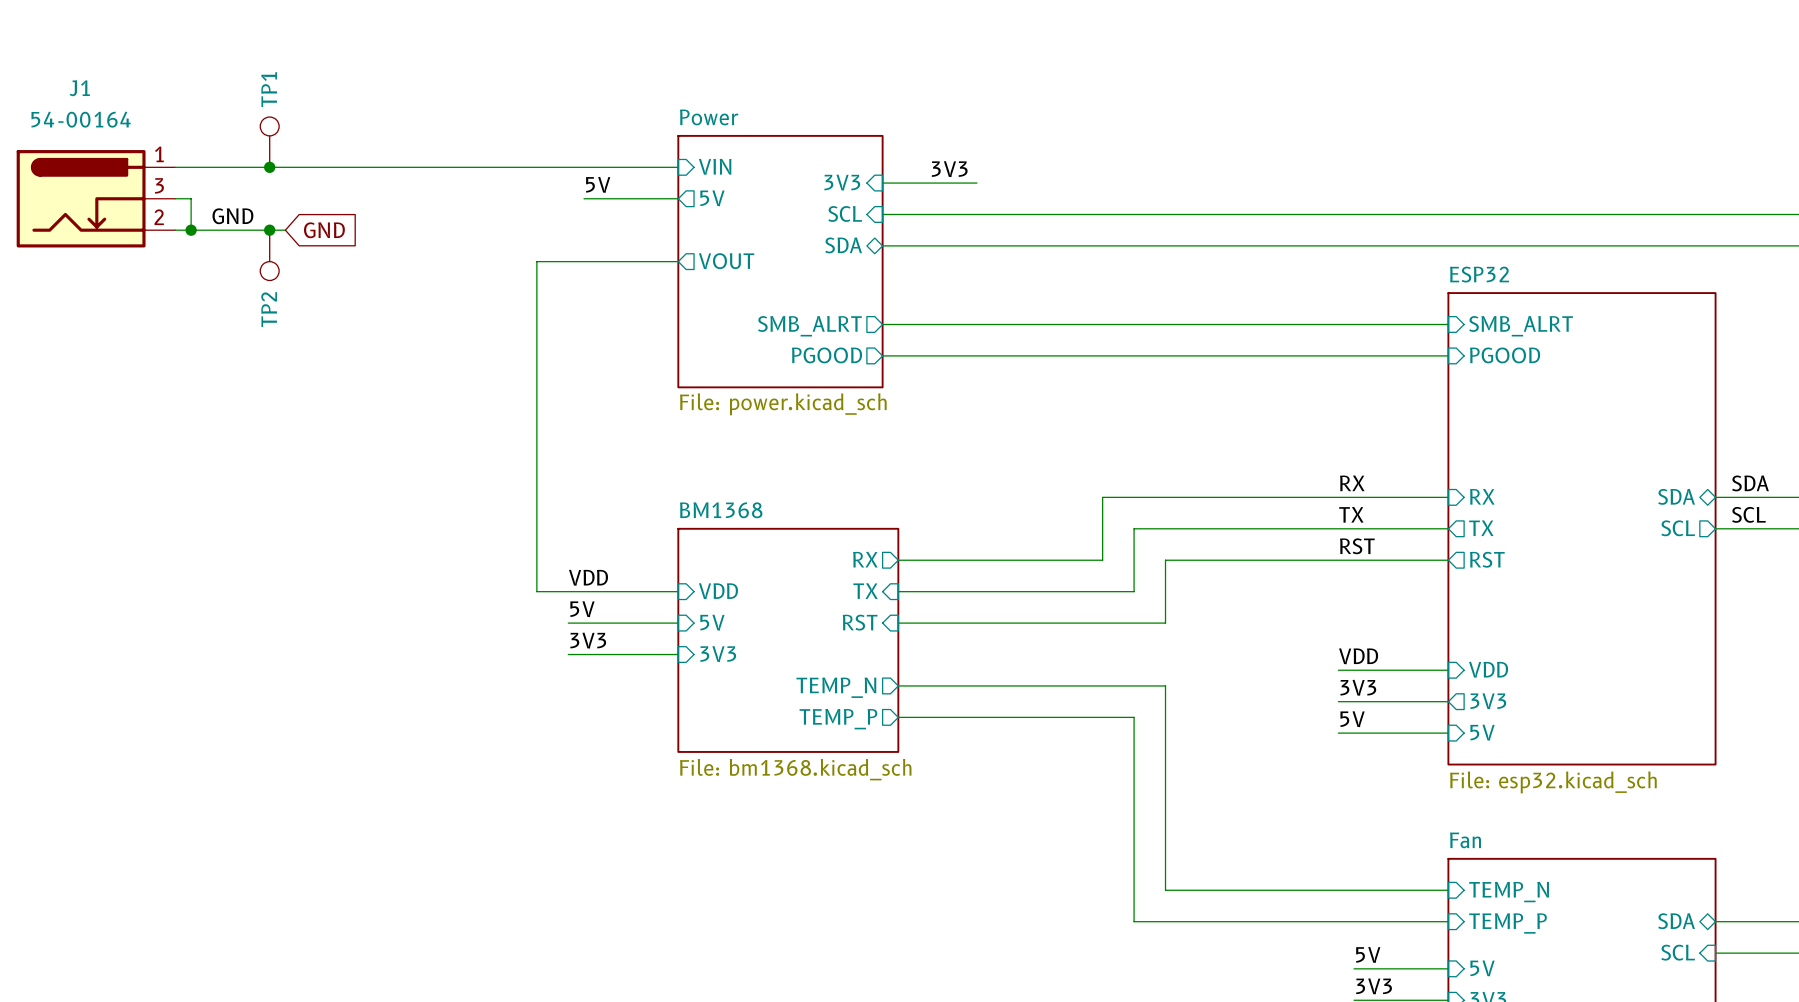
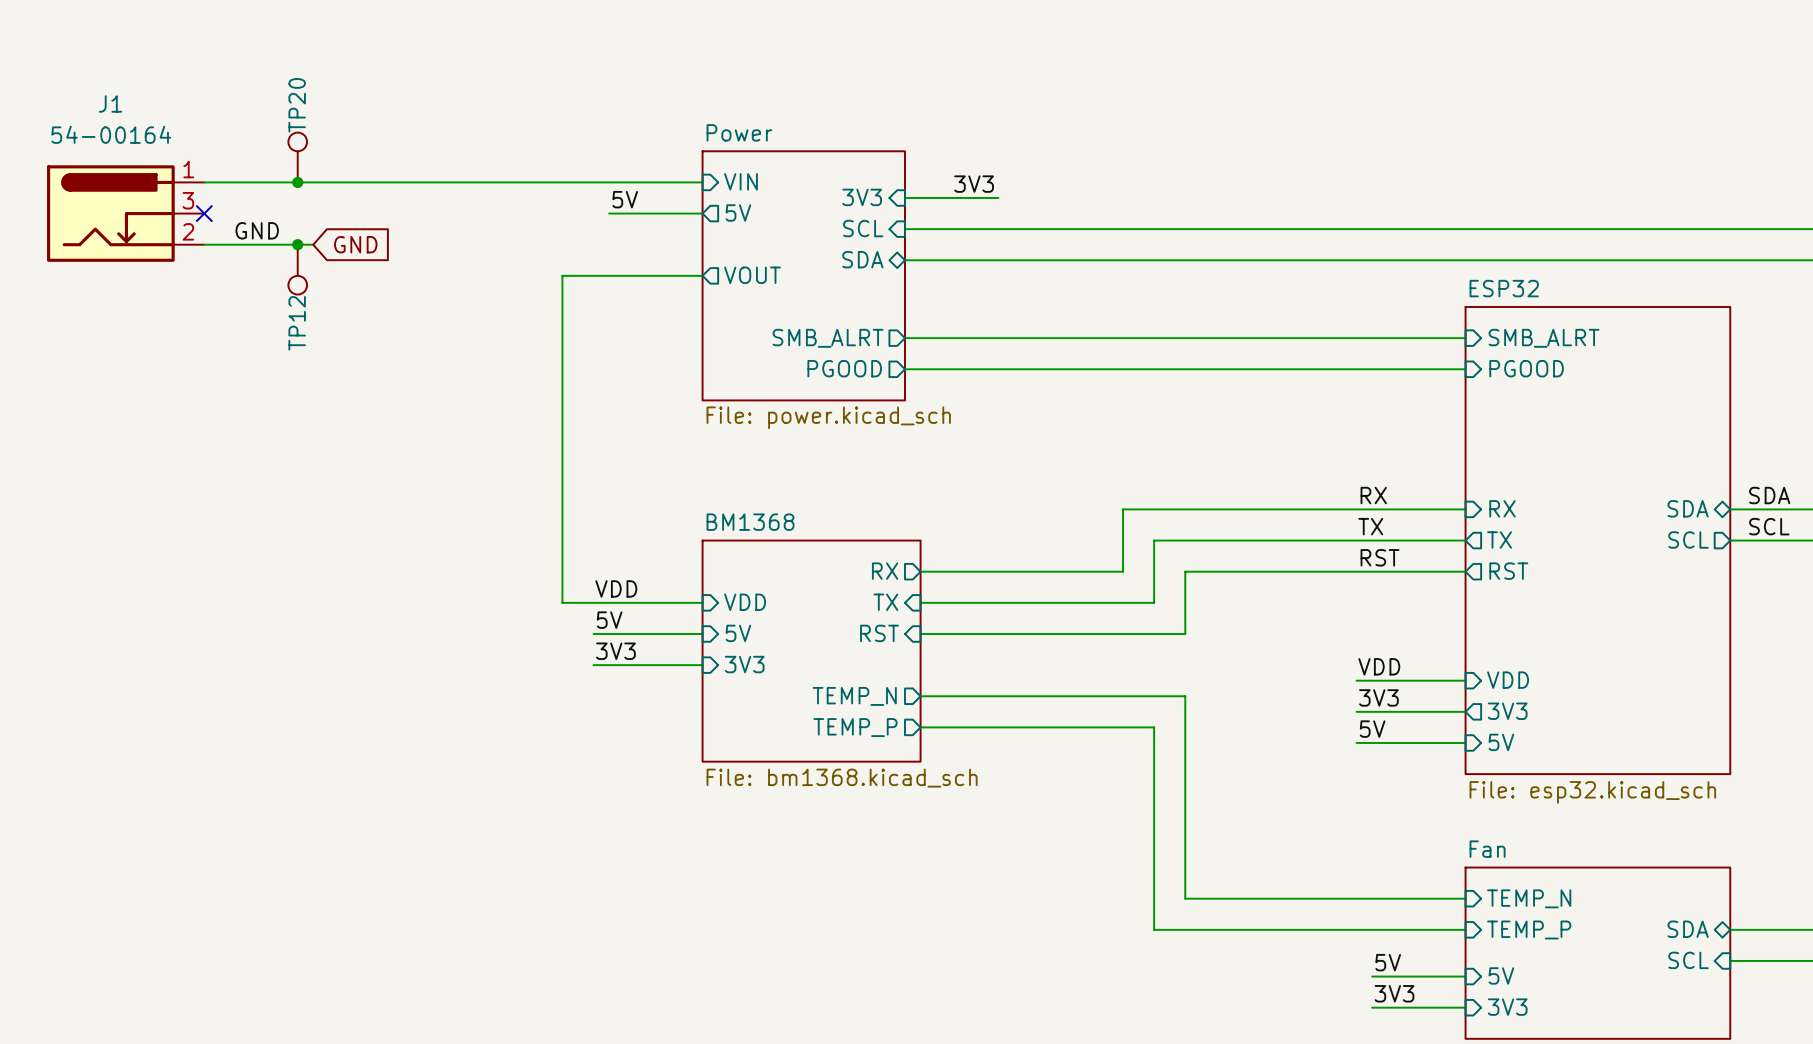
TP1 name: TP1 (269, 89) -> TP20 (297, 105)
wire: (175, 198) (191, 198) (191, 230) -> none
no-connect mark: none -> (204, 213)
junction: (191, 230) -> none
TP2 name: TP2 (269, 309) -> TP12 (297, 323)

